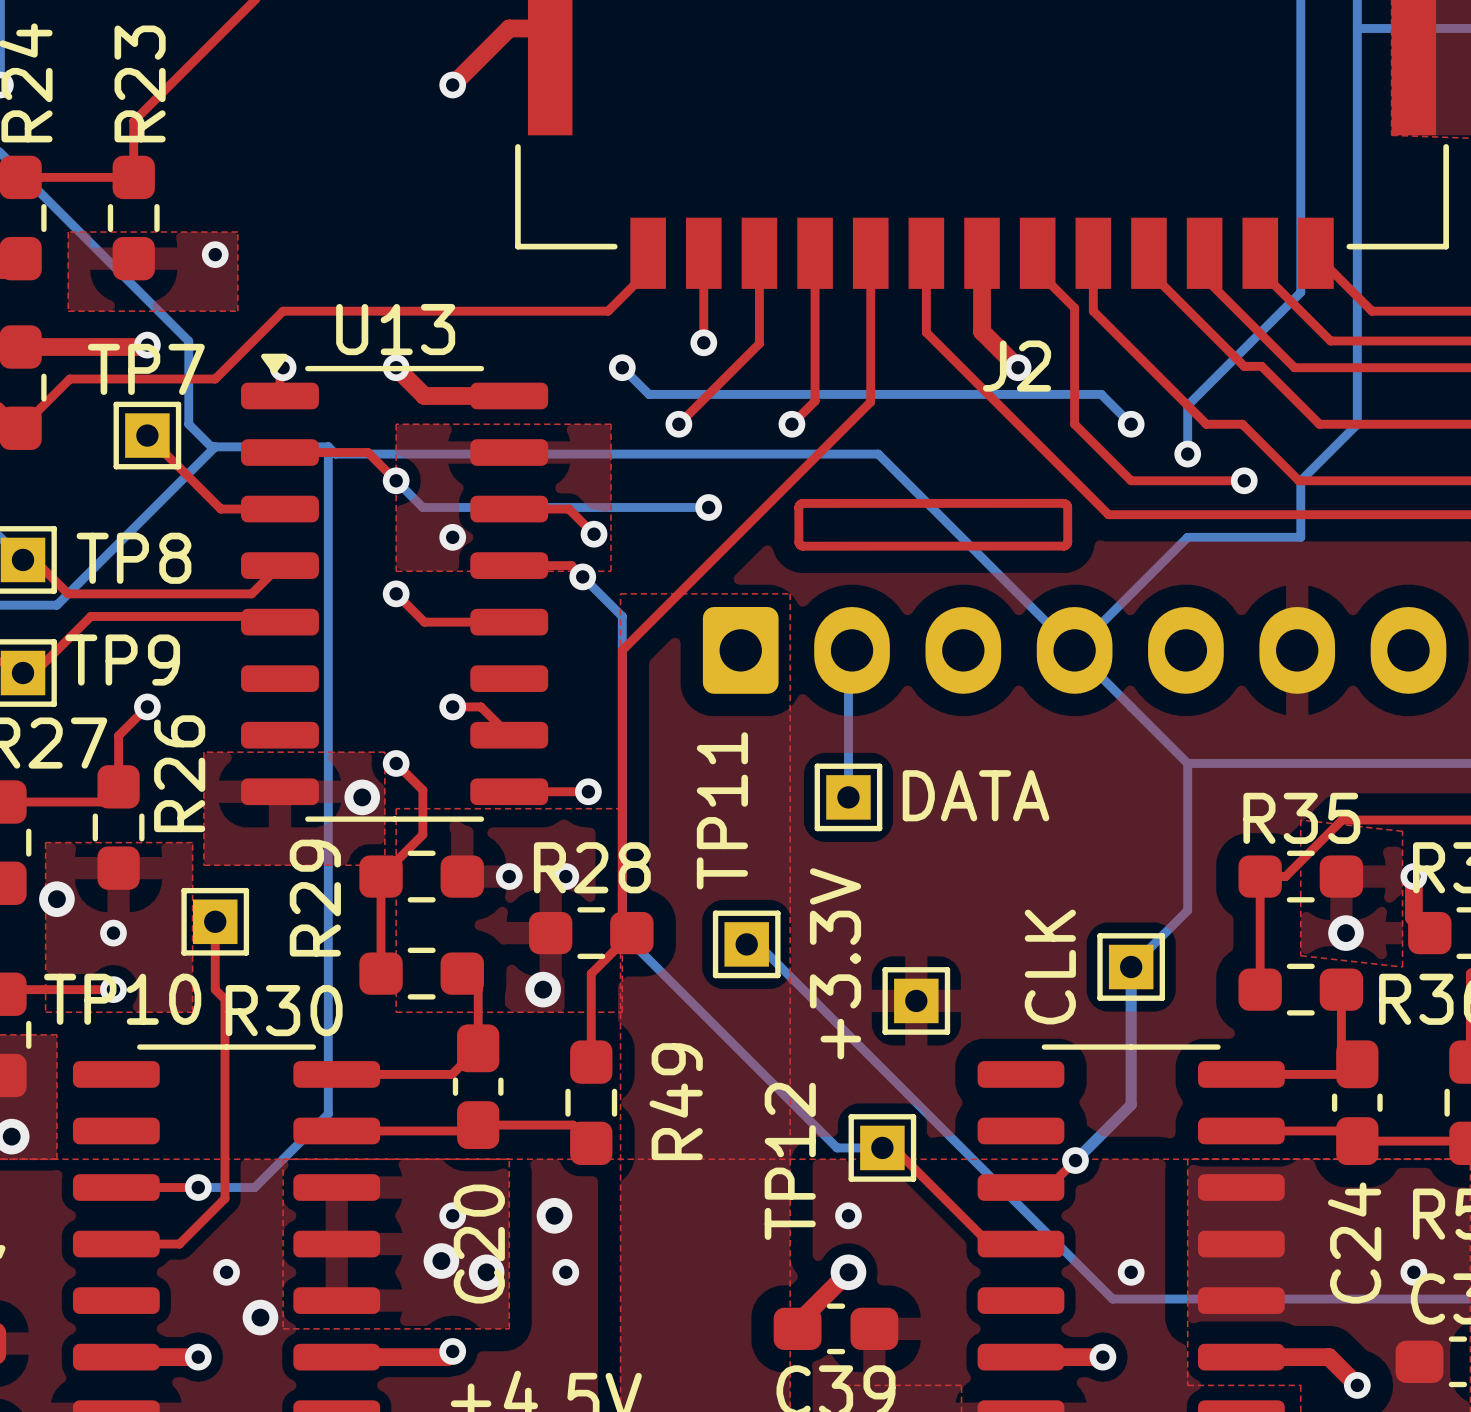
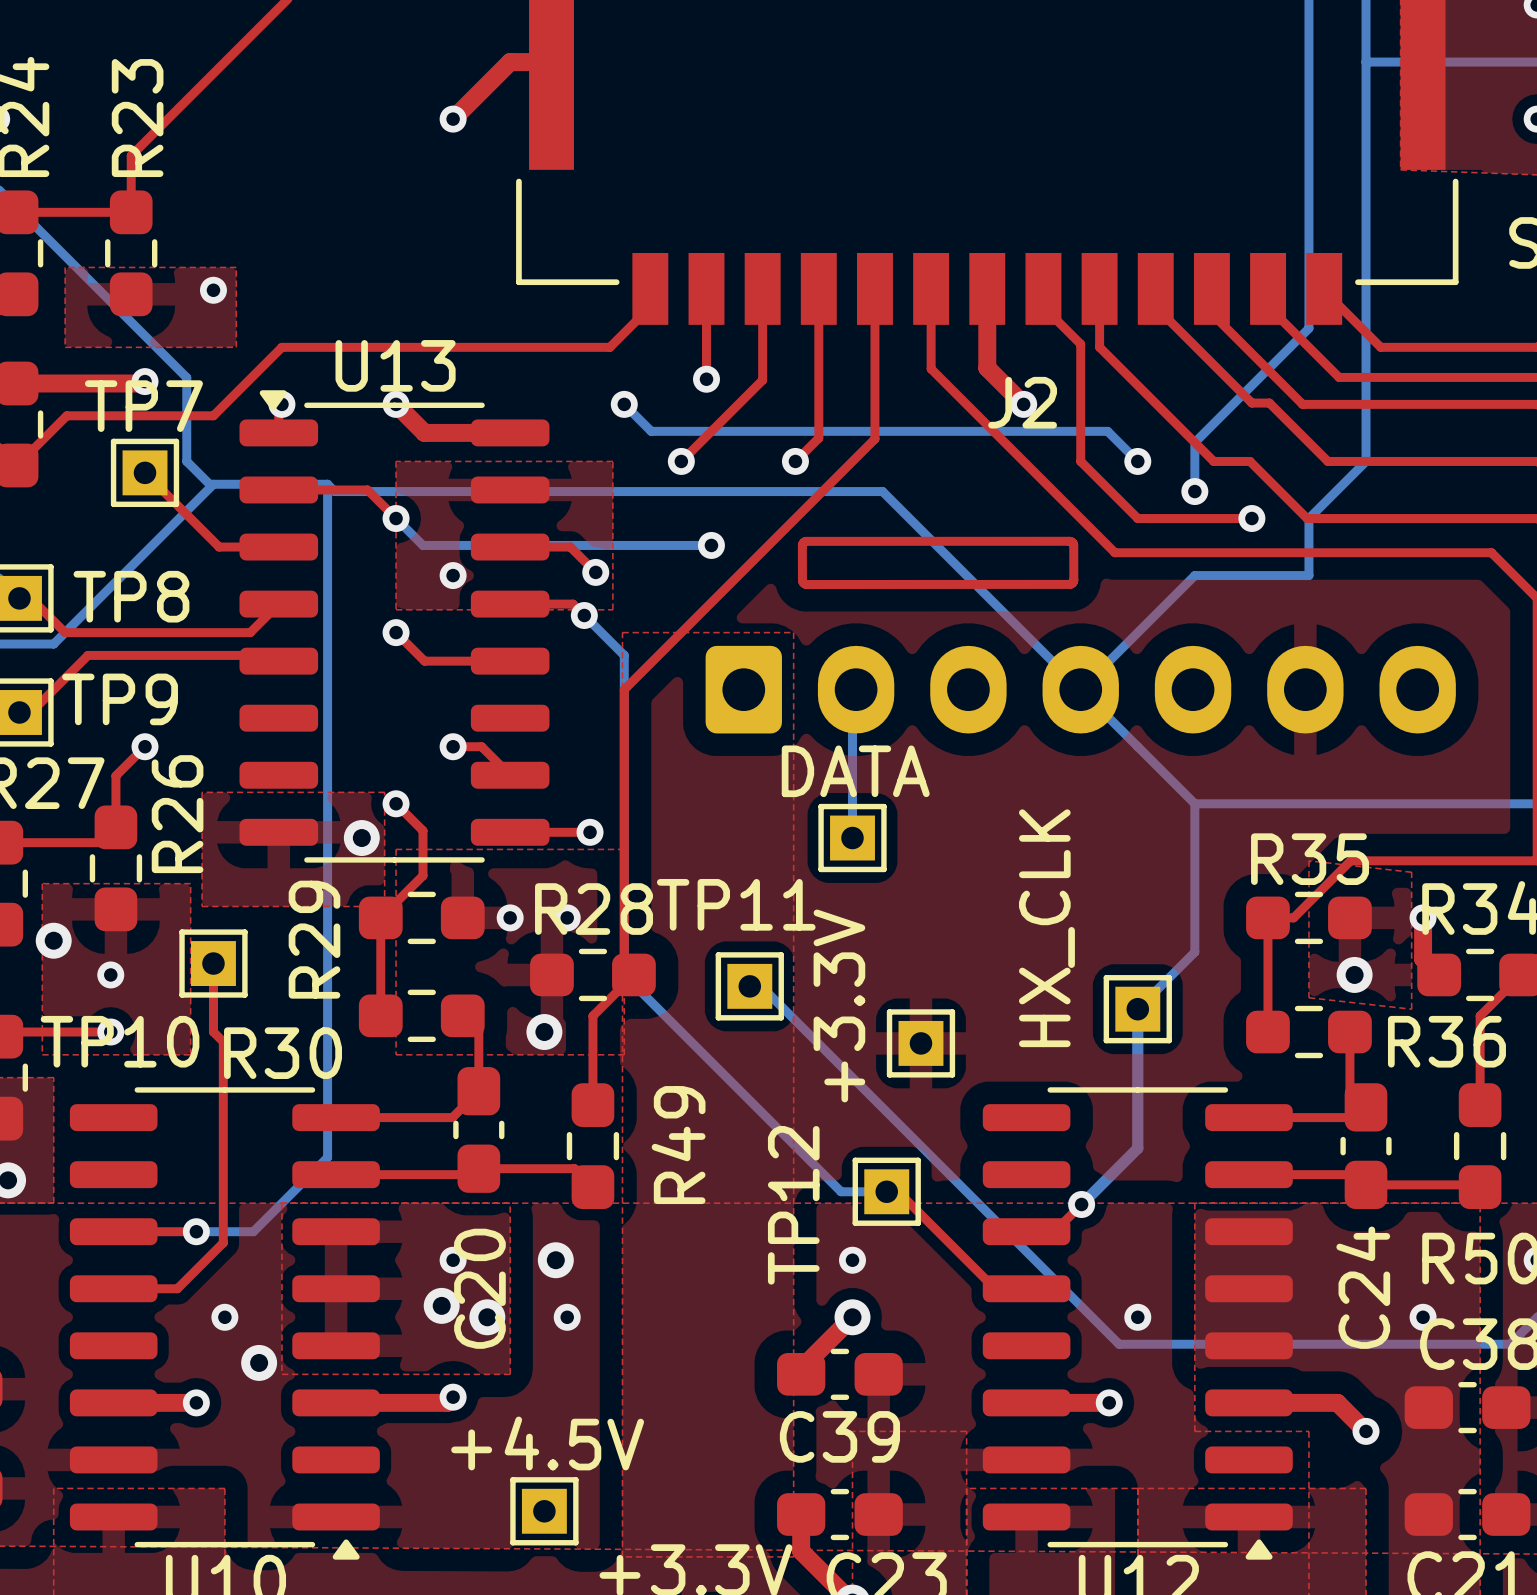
DATA name position: DATA (976, 795) -> DATA (855, 771)
TP11 name rotation: 0° (722, 810) -> 90° clockwise (736, 904)
CLK name: CLK (1050, 967) -> HX_CLK (1046, 928)

